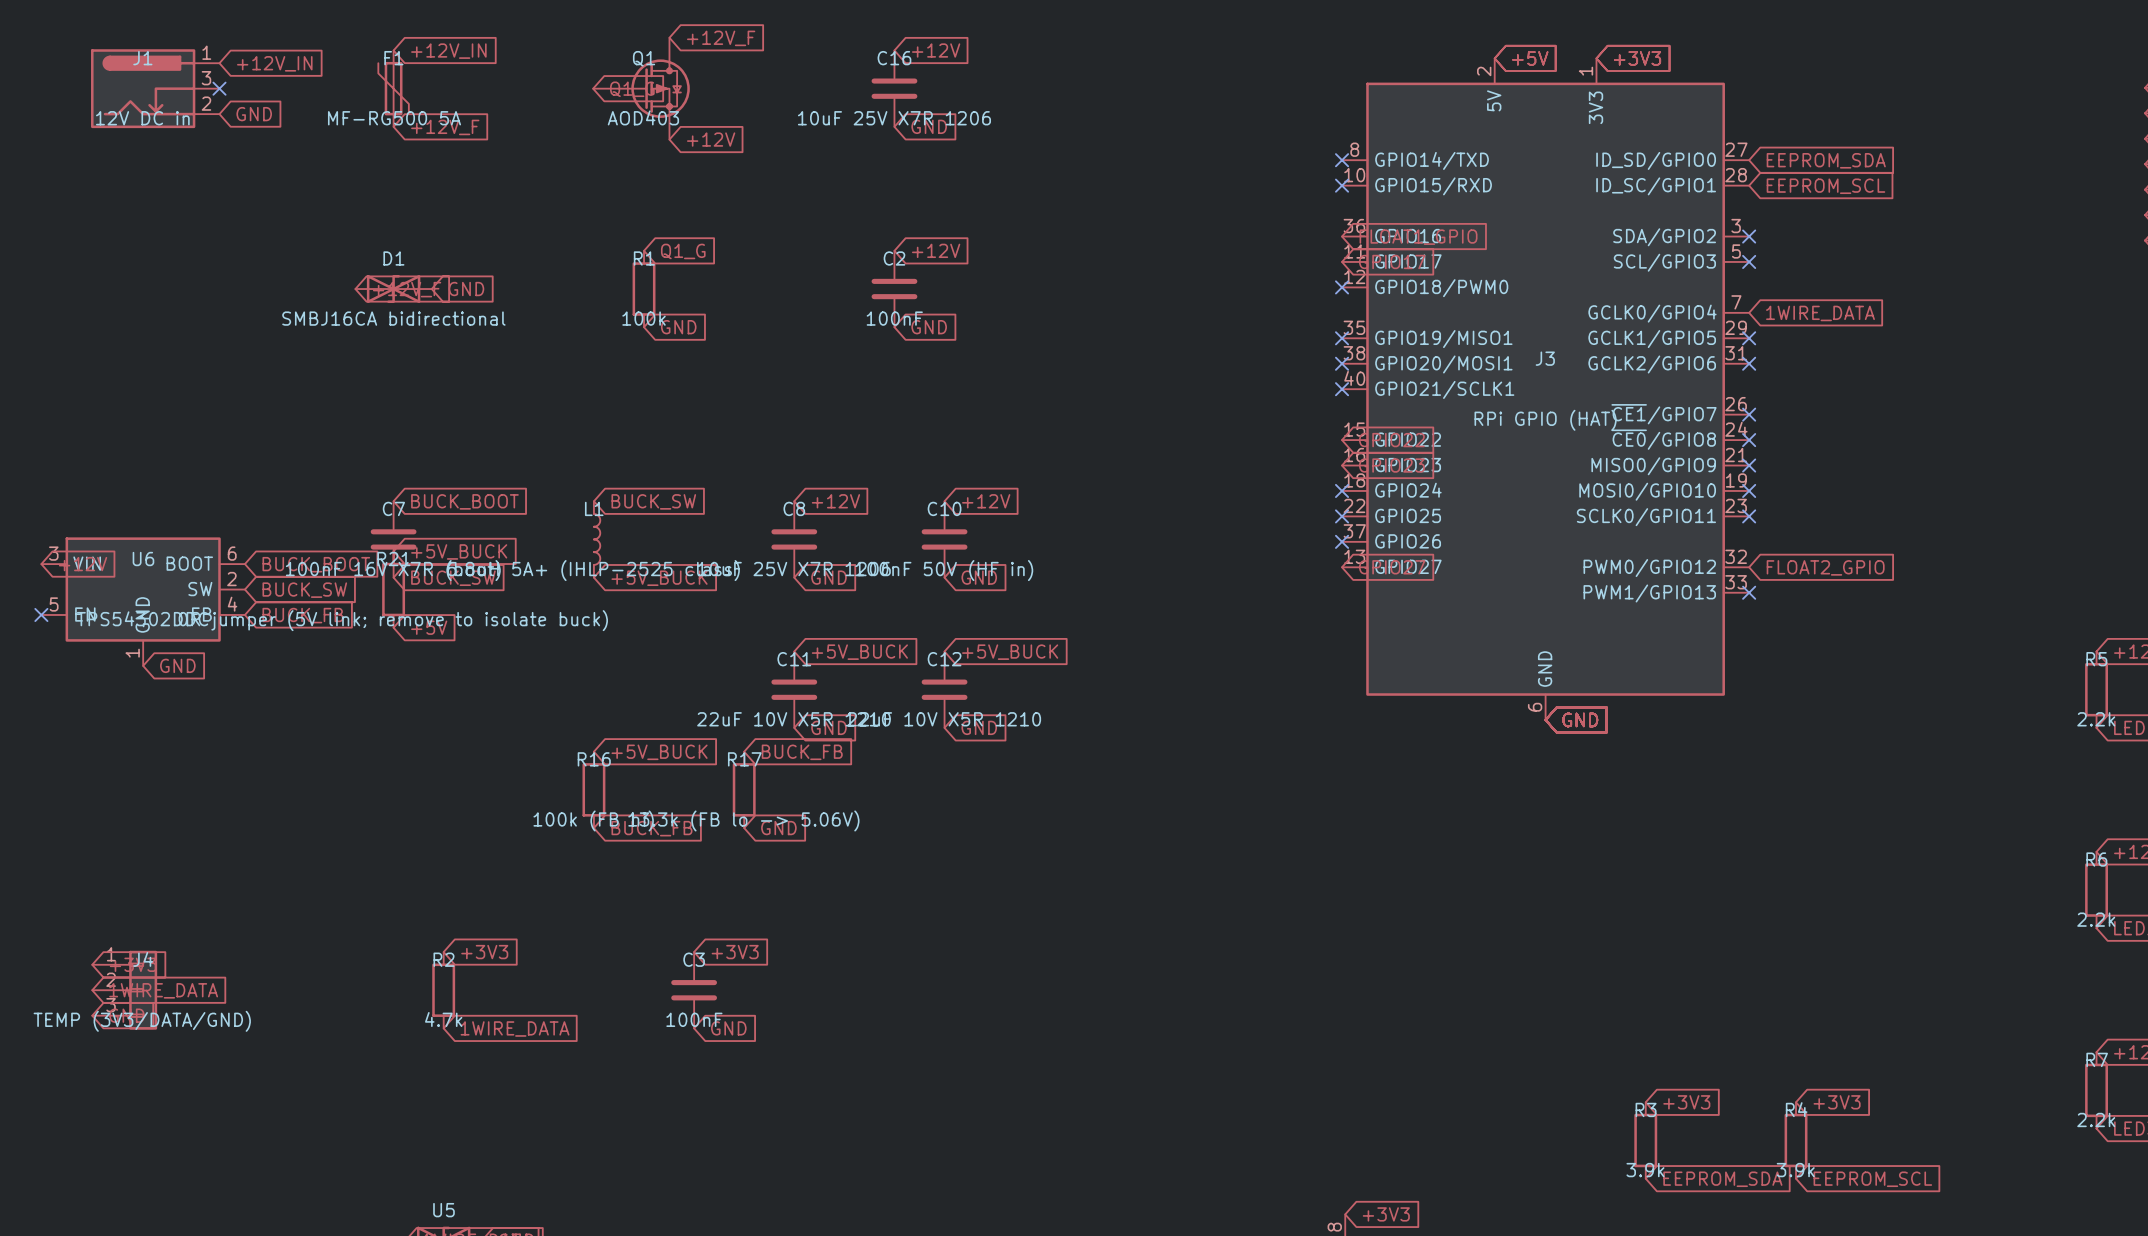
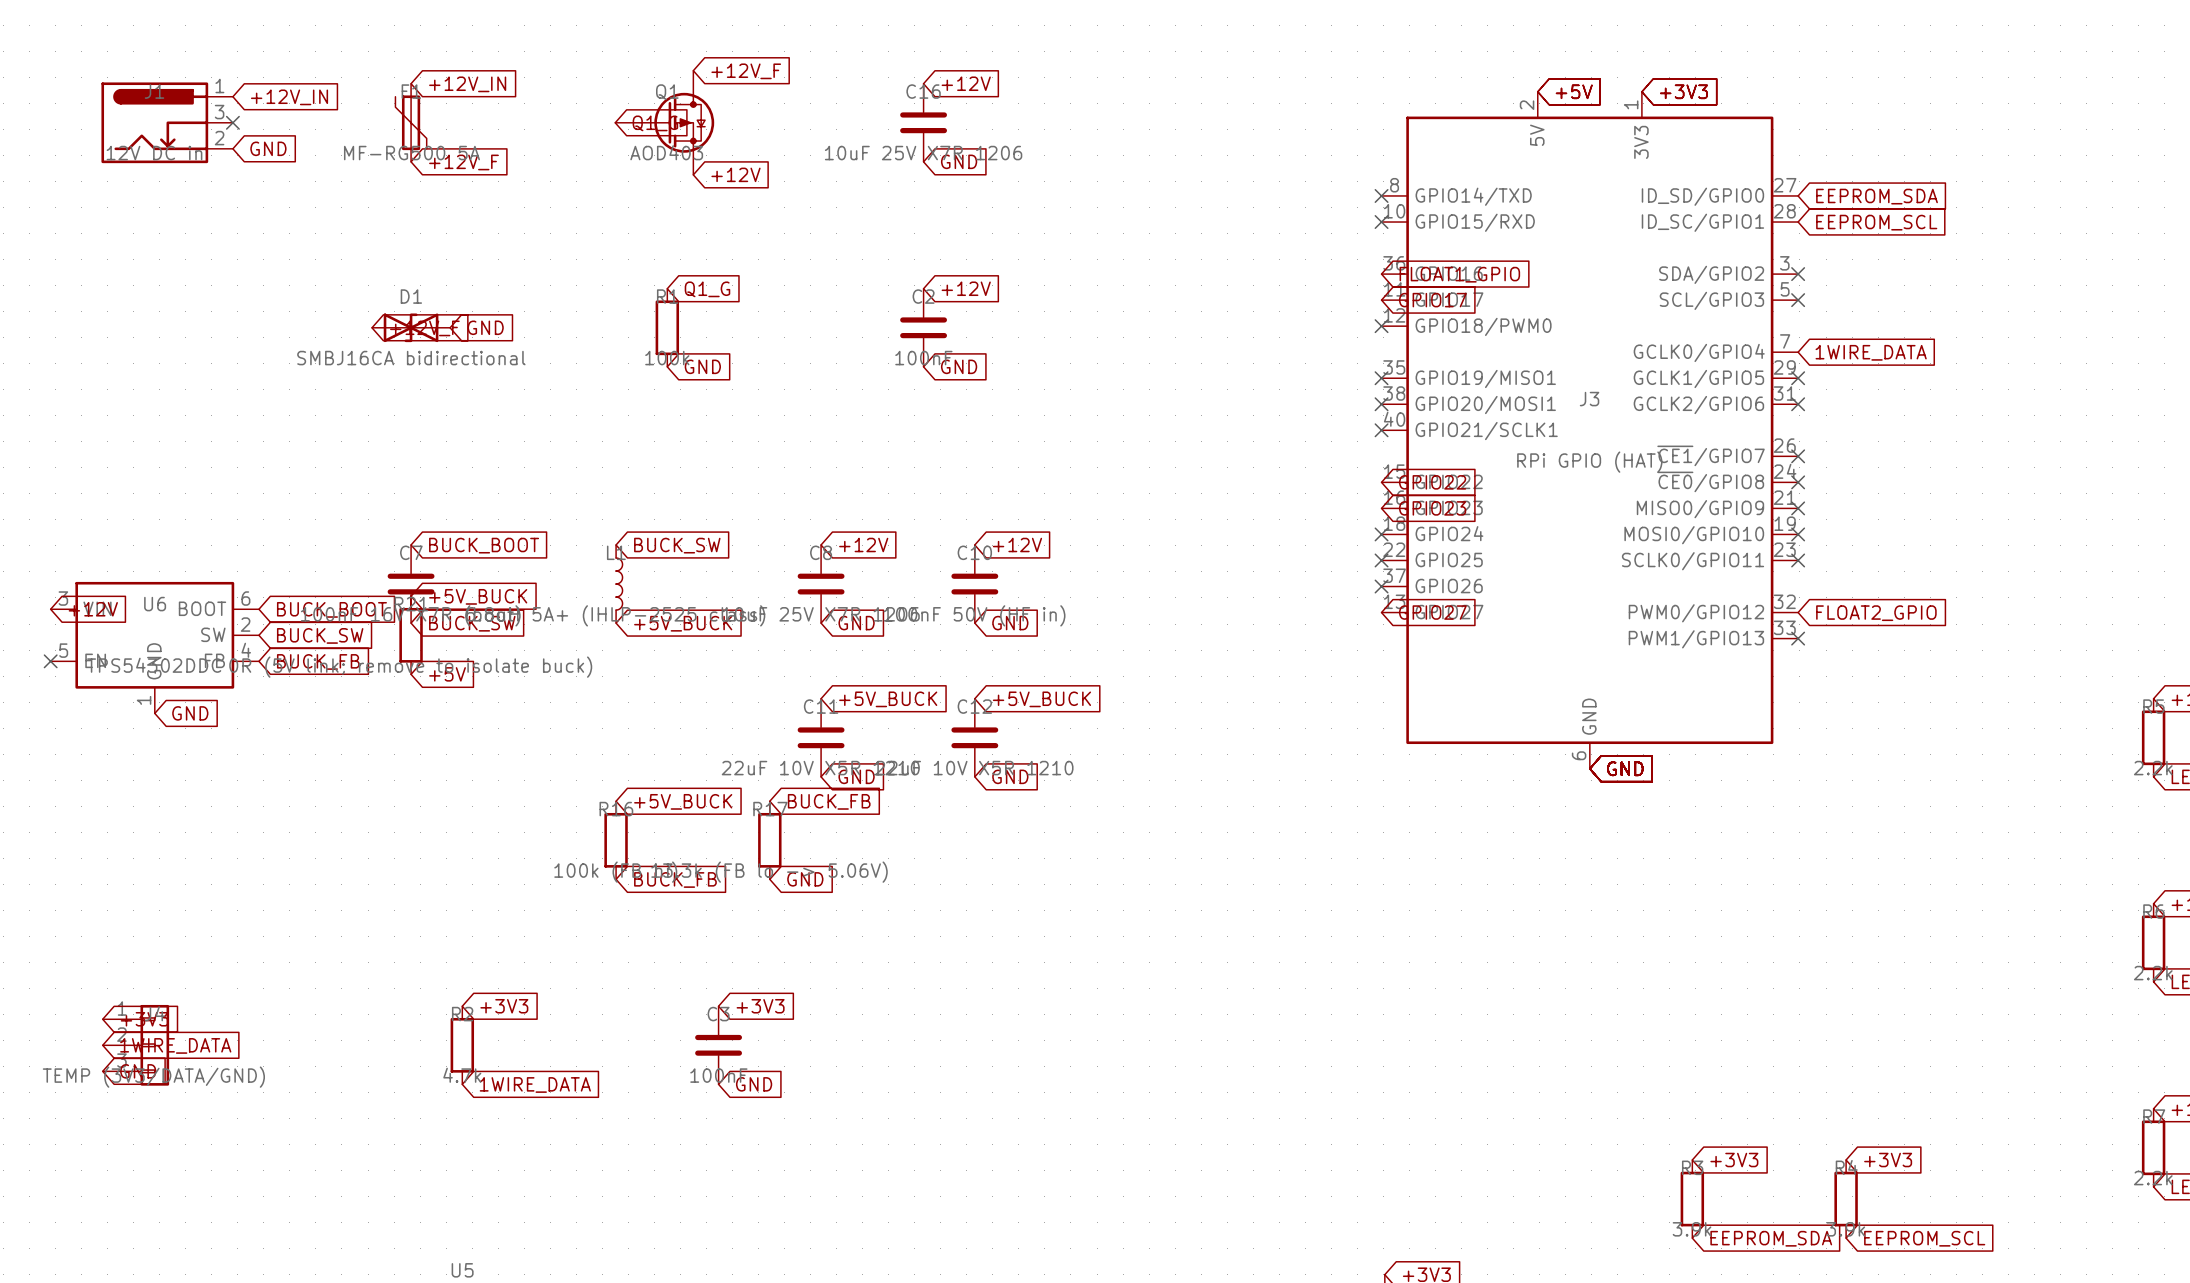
R21 value: 0R jumper (5V link; remove to isolate buck) (393, 620) -> 0R (5V link; remove to isolate buck) (410, 667)

